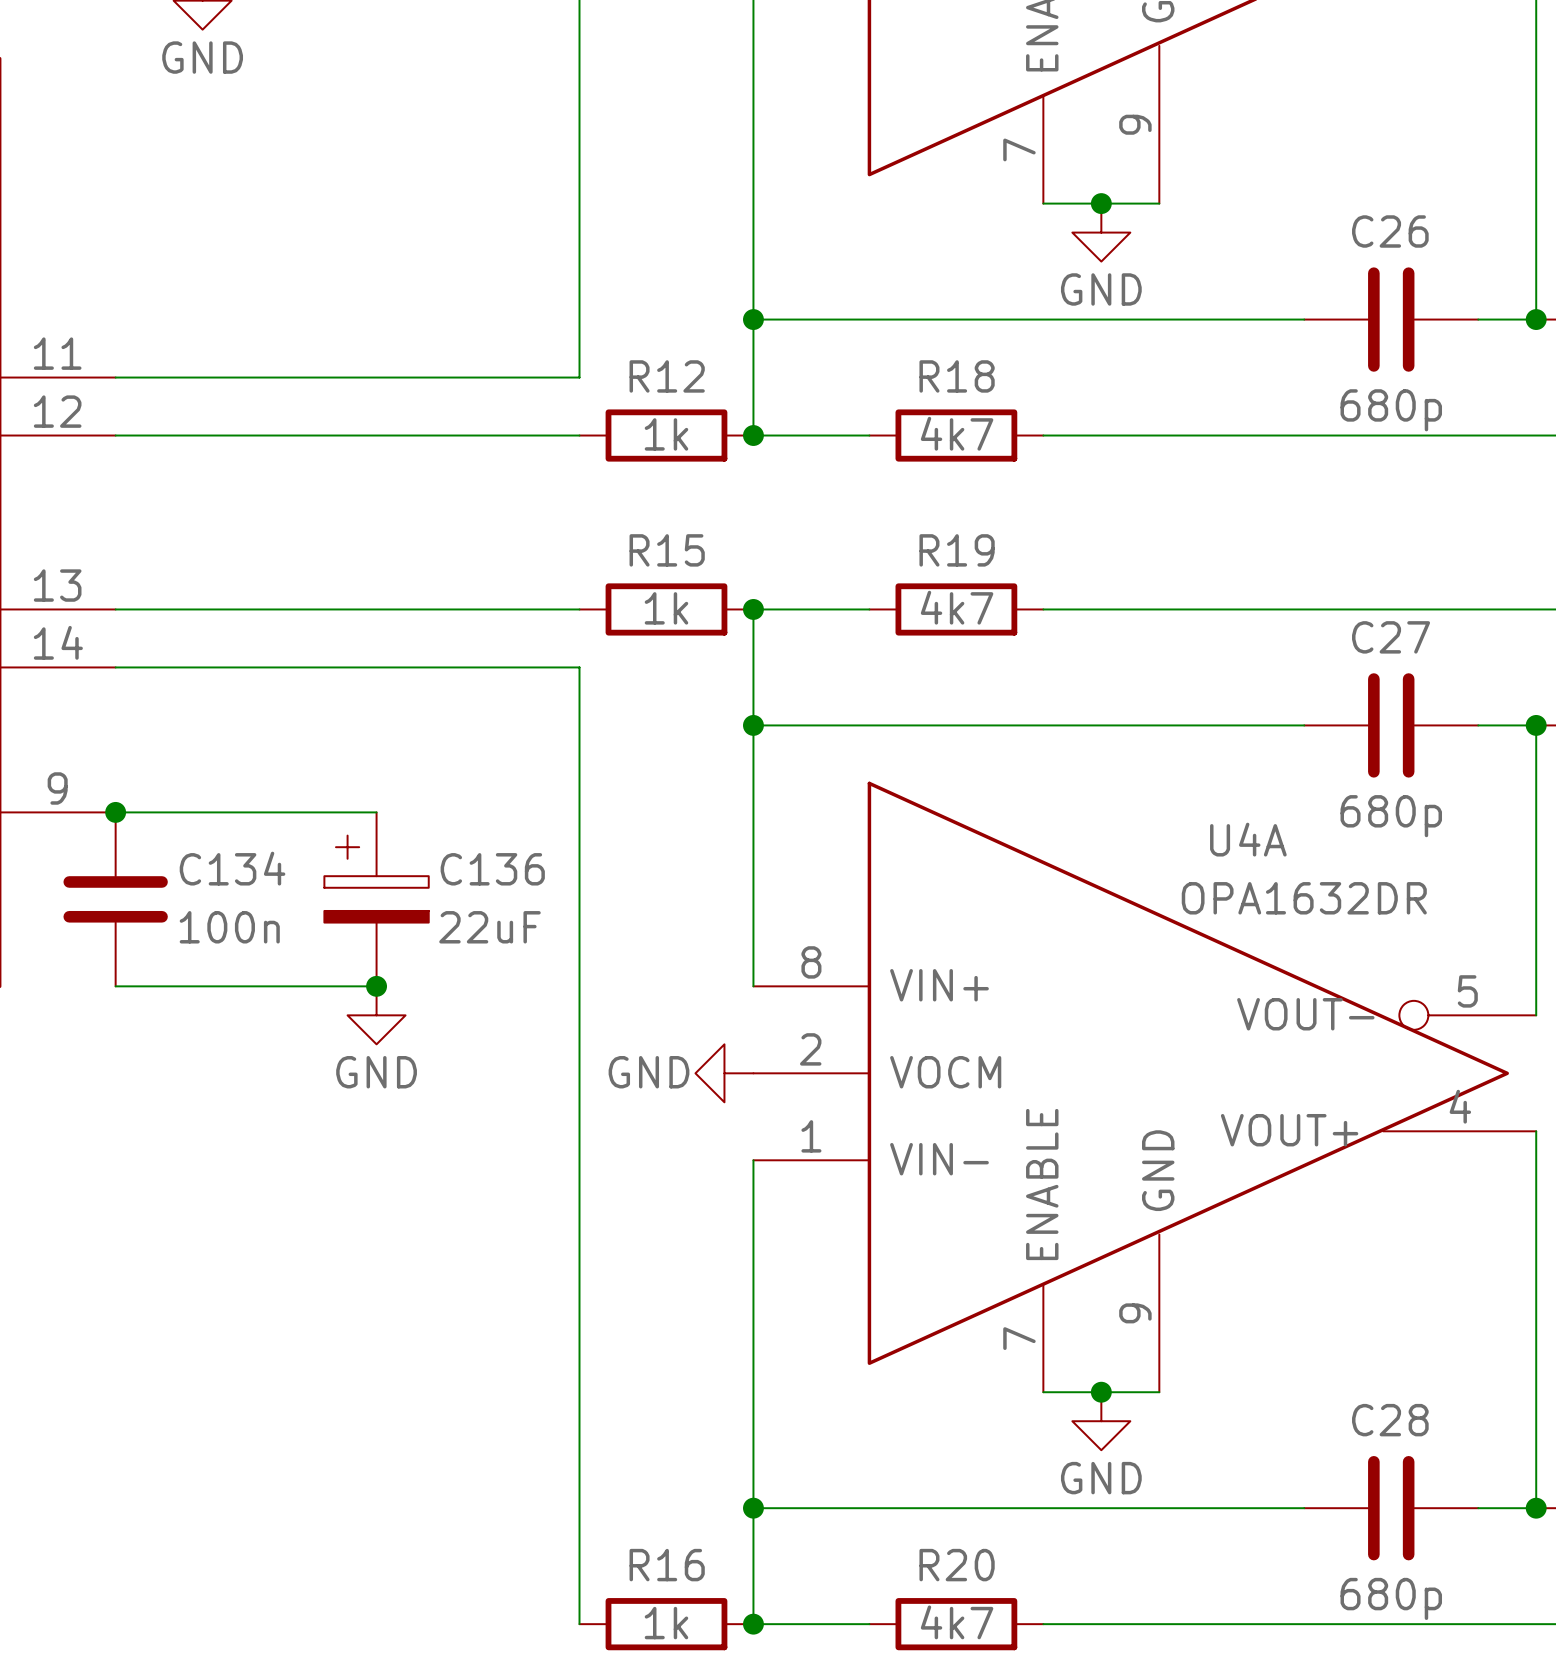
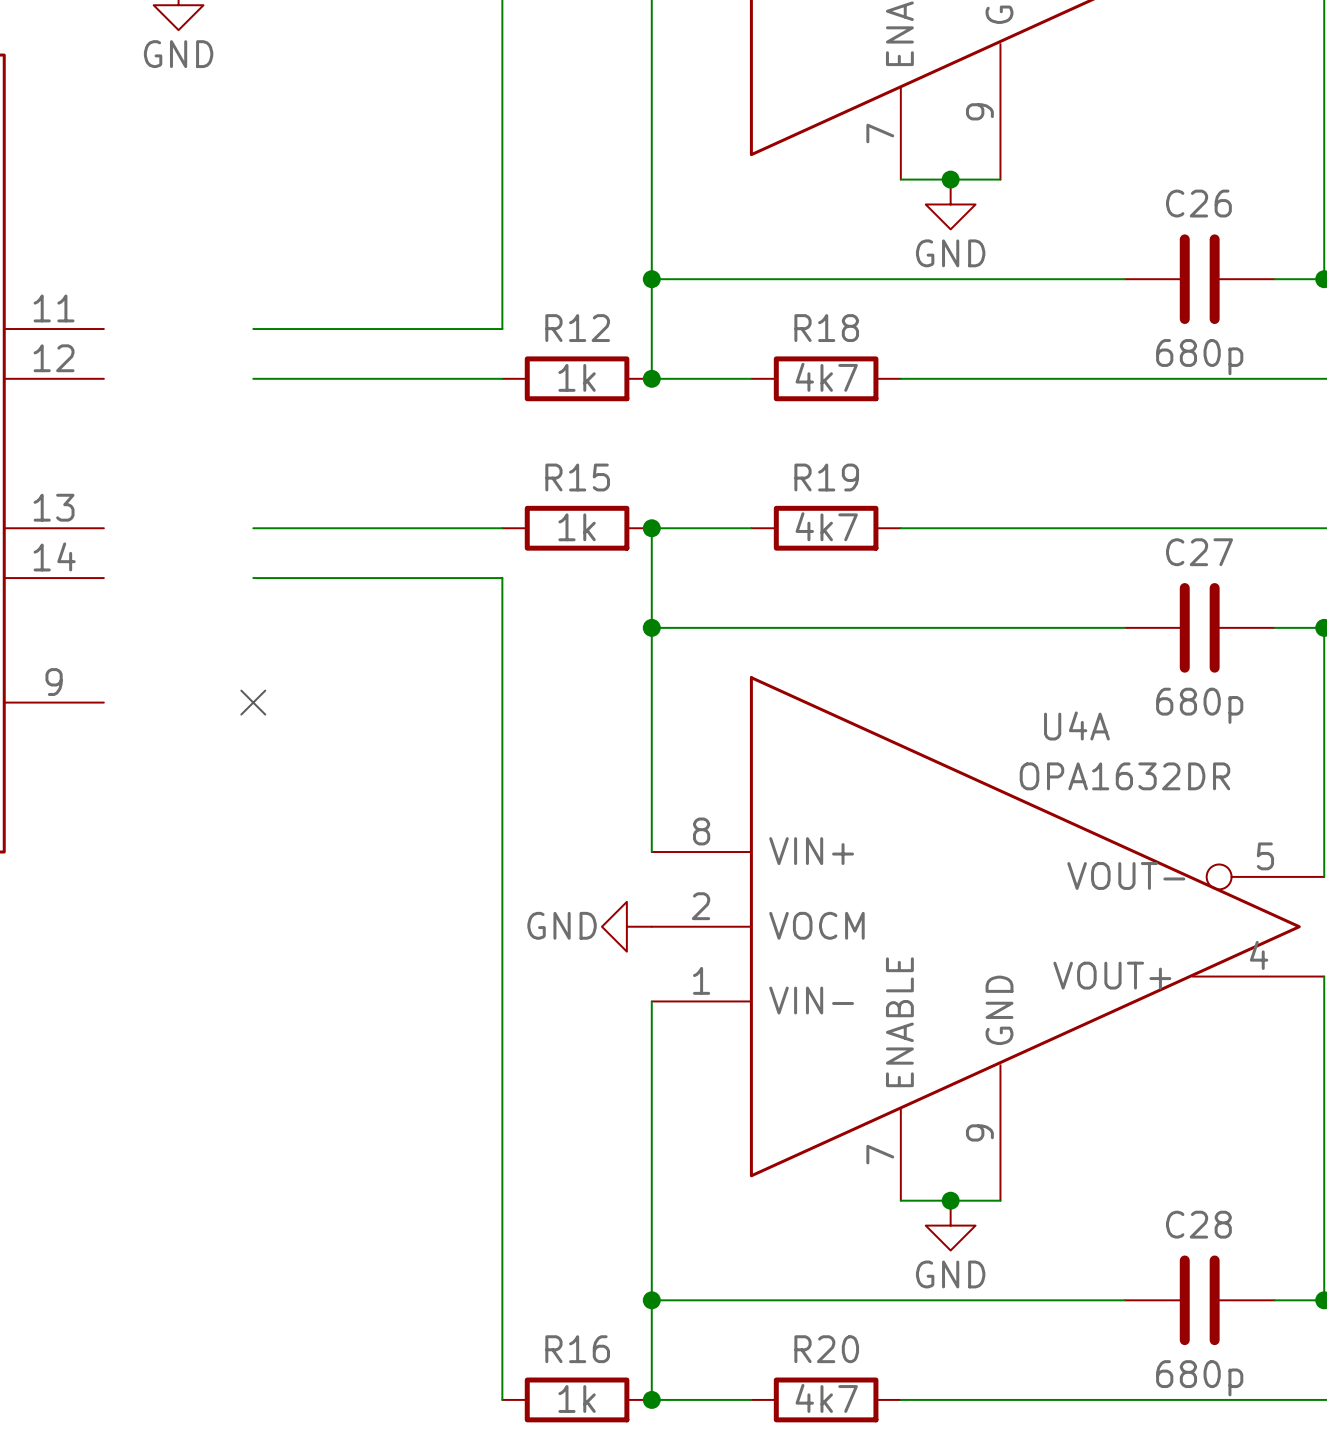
wire: (115, 377) (289, 377) -> none
wire: (115, 435) (289, 435) -> none
wire: (115, 609) (289, 609) -> none
wire: (115, 667) (289, 667) -> none
wire: (115, 812) (376, 812) -> none
junction: (115, 812) -> none
no-connect mark: none -> (253, 702)
C134: 100n (115, 899) -> none
C136: 22uF (376, 899) -> none
wire: (115, 986) (376, 986) -> none
junction: (376, 986) -> none
power symbol: GND (376, 1015) -> none

